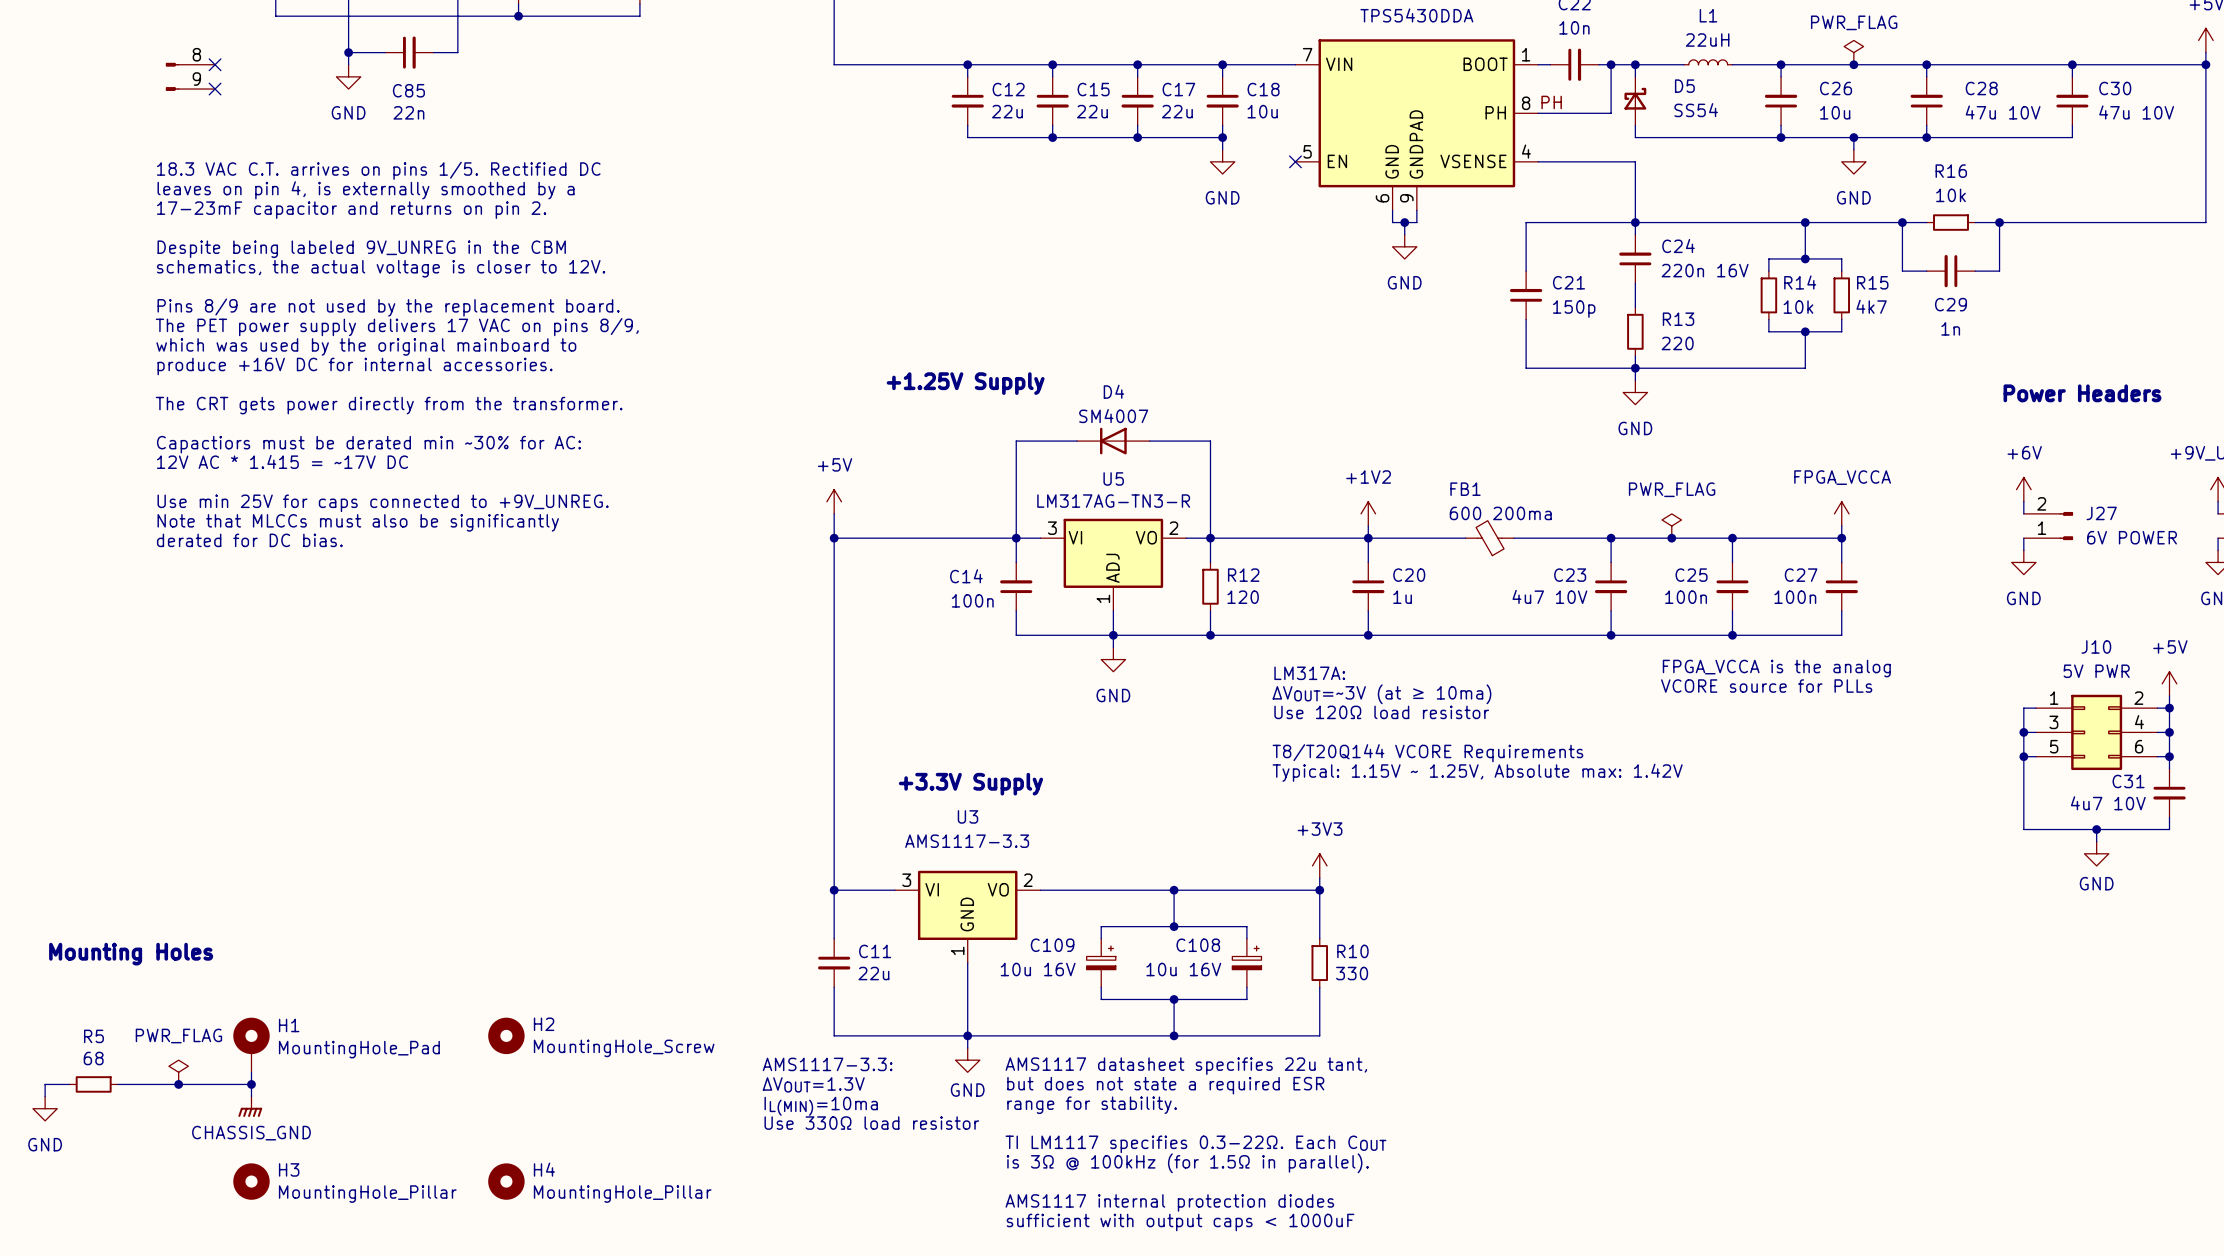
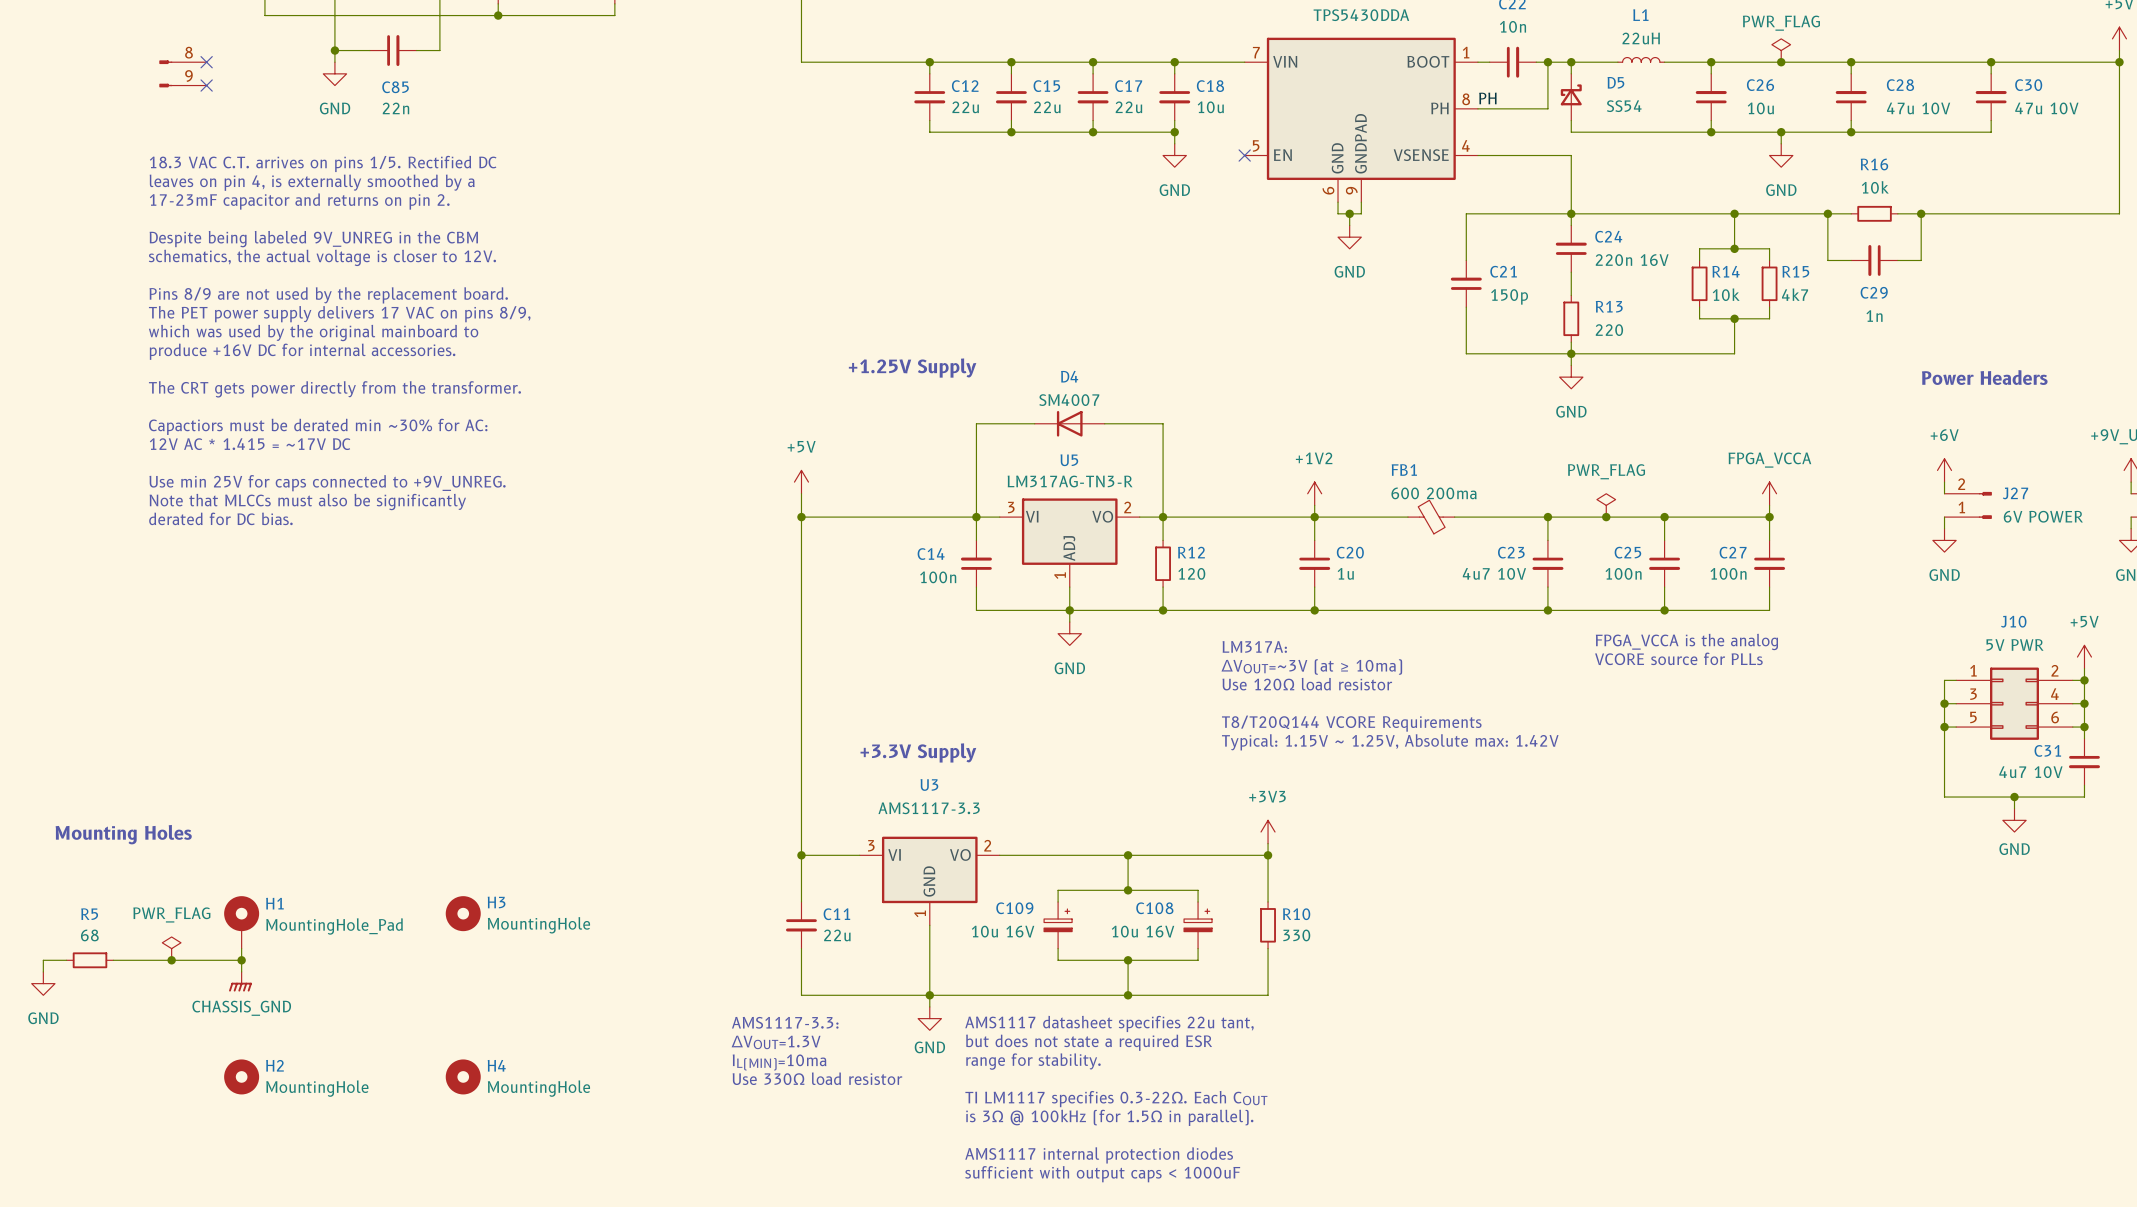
text position: Mounting Holes (131, 954) -> Mounting Holes (123, 834)
junction: none -> (171, 960)
junction: none -> (241, 960)
H2 position: (506, 1035) -> (241, 1076)
H1 position: (251, 1044) -> (241, 922)
H2 value: MountingHole_Screw (624, 1048) -> MountingHole (317, 1088)
power symbol position: PWR_FLAG (178, 1072) -> PWR_FLAG (171, 948)
wire: (251, 1072) (251, 1096) -> (241, 948) (241, 971)
wire: (69, 1084) (45, 1084) (45, 1096) -> (66, 960) (43, 960) (43, 971)
R5 position: (93, 1084) -> (90, 960)
wire: (117, 1084) (251, 1084) -> (113, 960) (241, 960)
junction: (178, 1084) -> none
junction: (251, 1084) -> none
power symbol position: CHASSIS_GND (250, 1106) -> CHASSIS_GND (240, 981)
power symbol position: GND (45, 1108) -> GND (43, 983)
H3 position: (251, 1181) -> (463, 913)
H4 position: (506, 1181) -> (463, 1076)
H3 value: MountingHole_Pillar (367, 1194) -> MountingHole (538, 925)
H4 value: MountingHole_Pillar (622, 1194) -> MountingHole (538, 1088)

